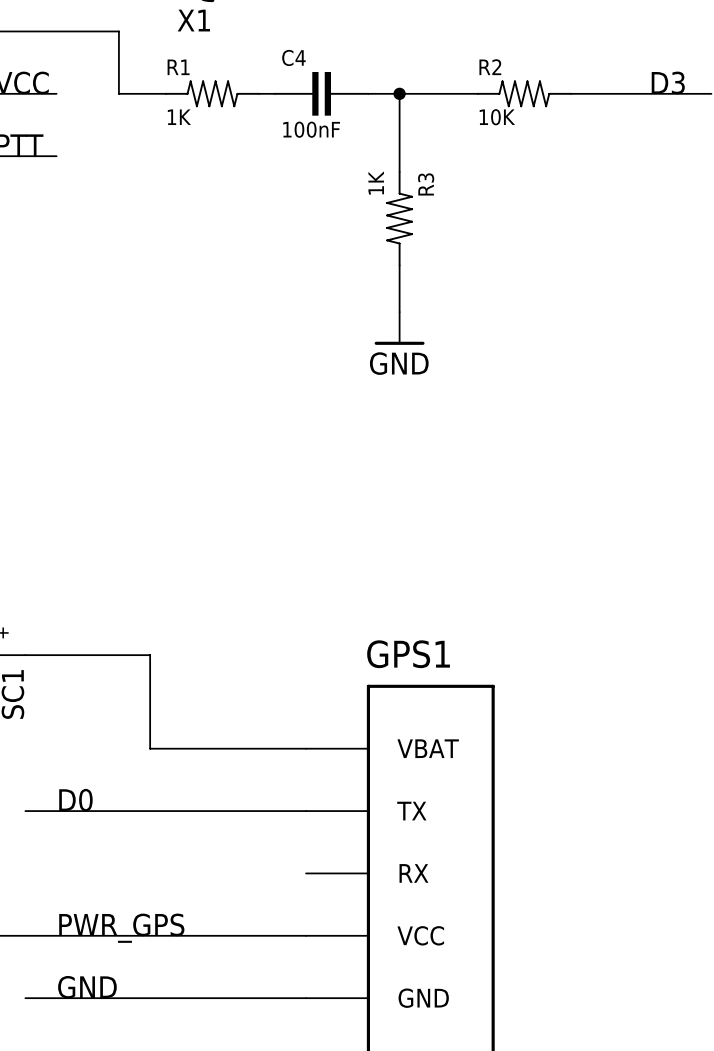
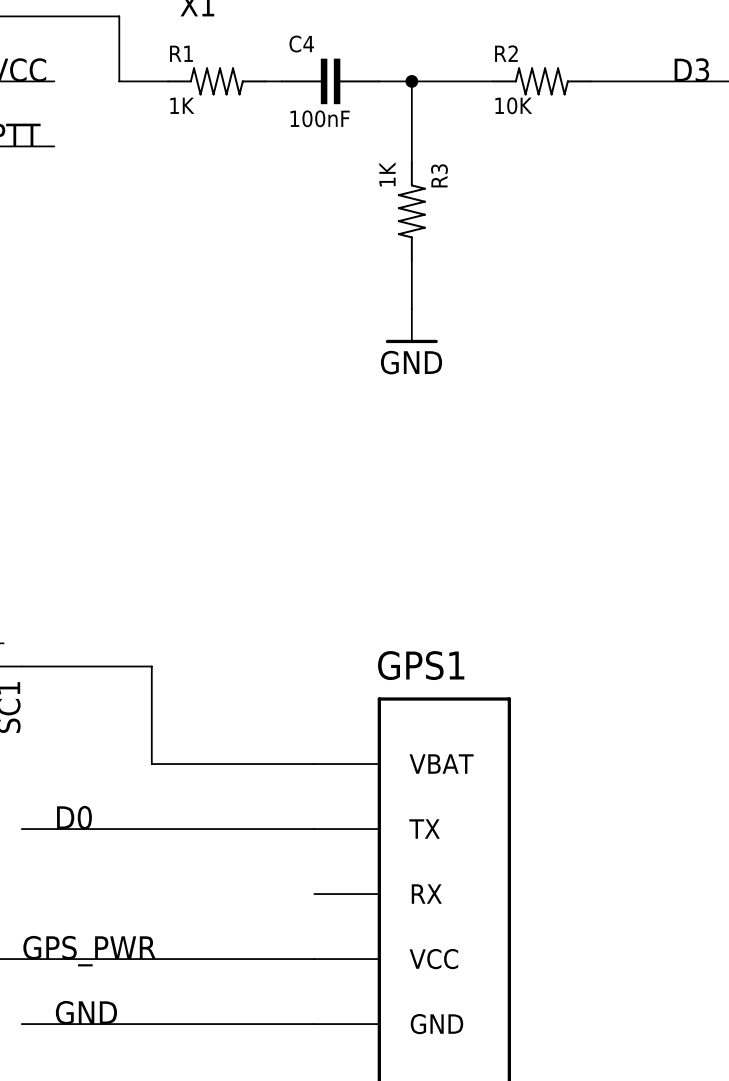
label: none -> GPS_PWR (89, 951)
label: PWR_GPS (121, 928) -> none

